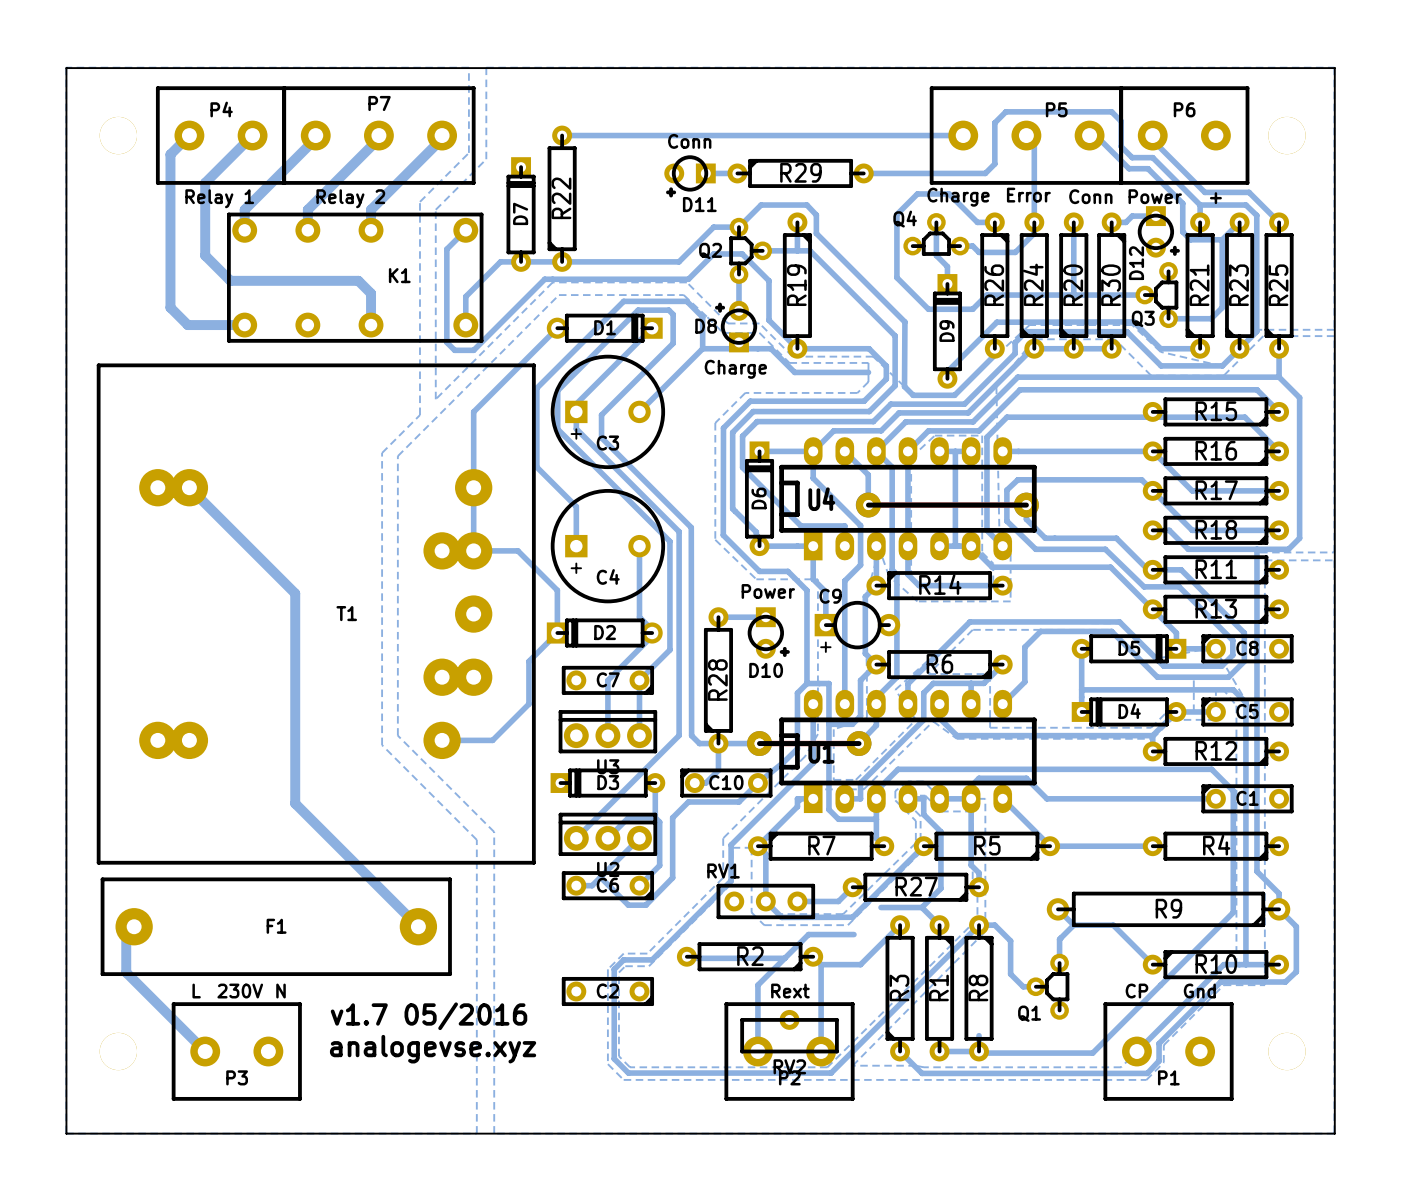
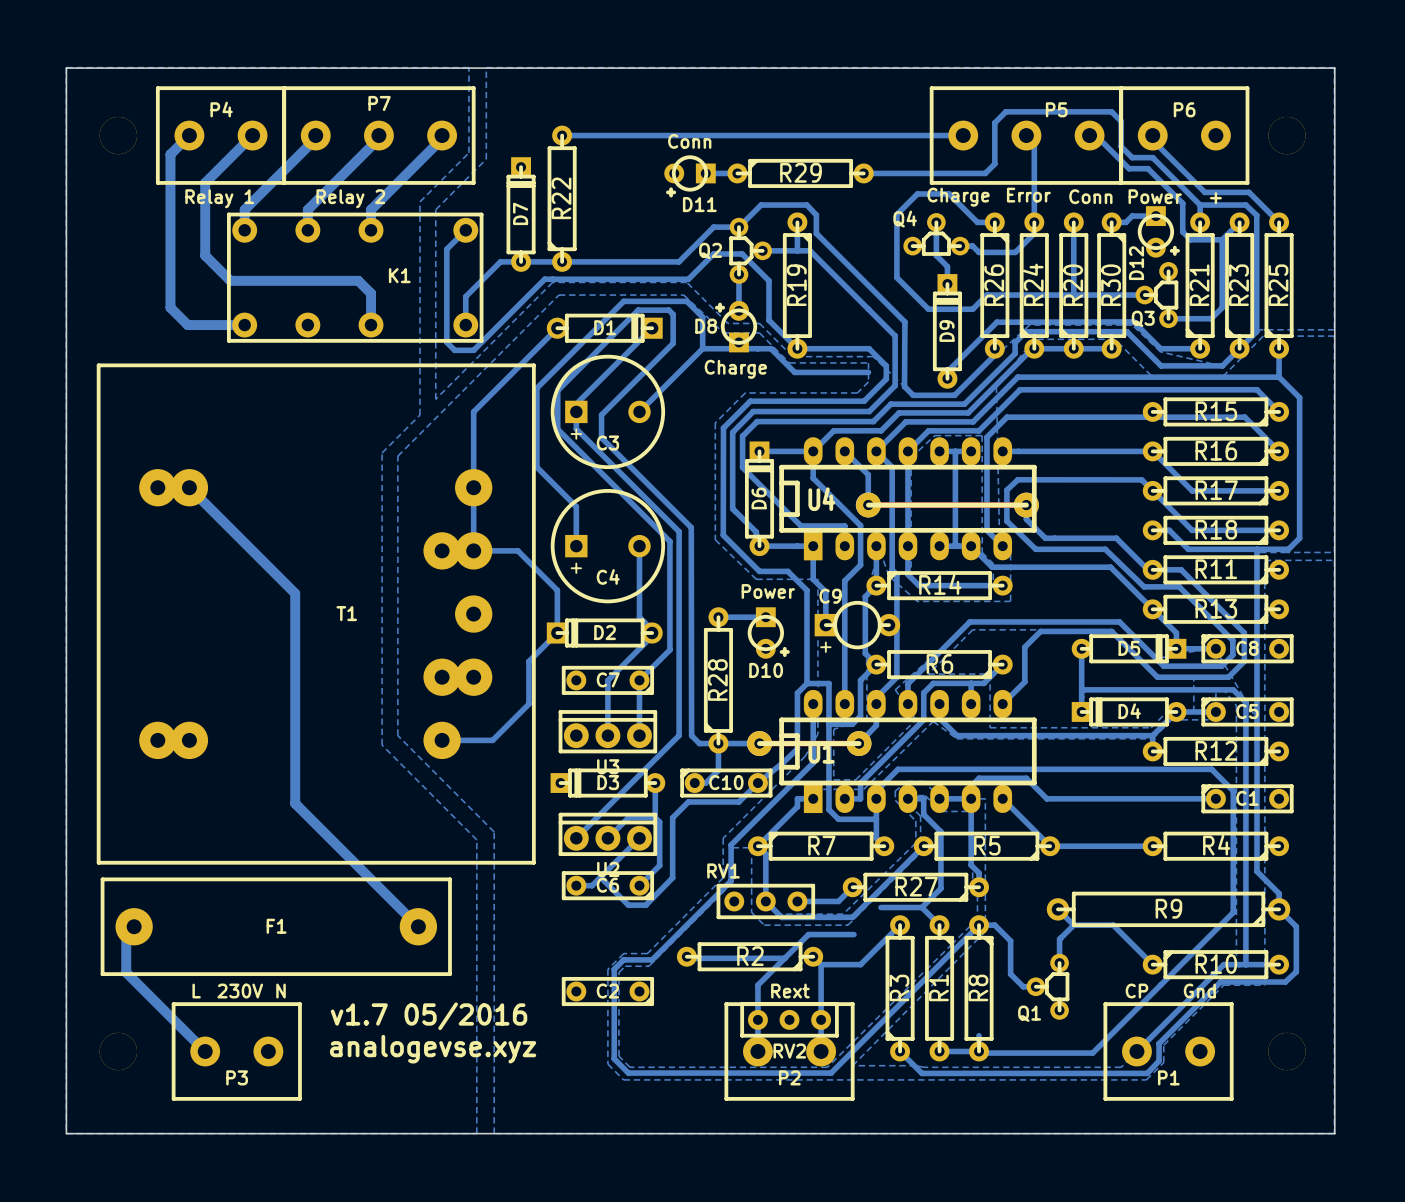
RV2 footprint: [740, 1009, 839, 1062] -> [740, 1002, 839, 1038]

